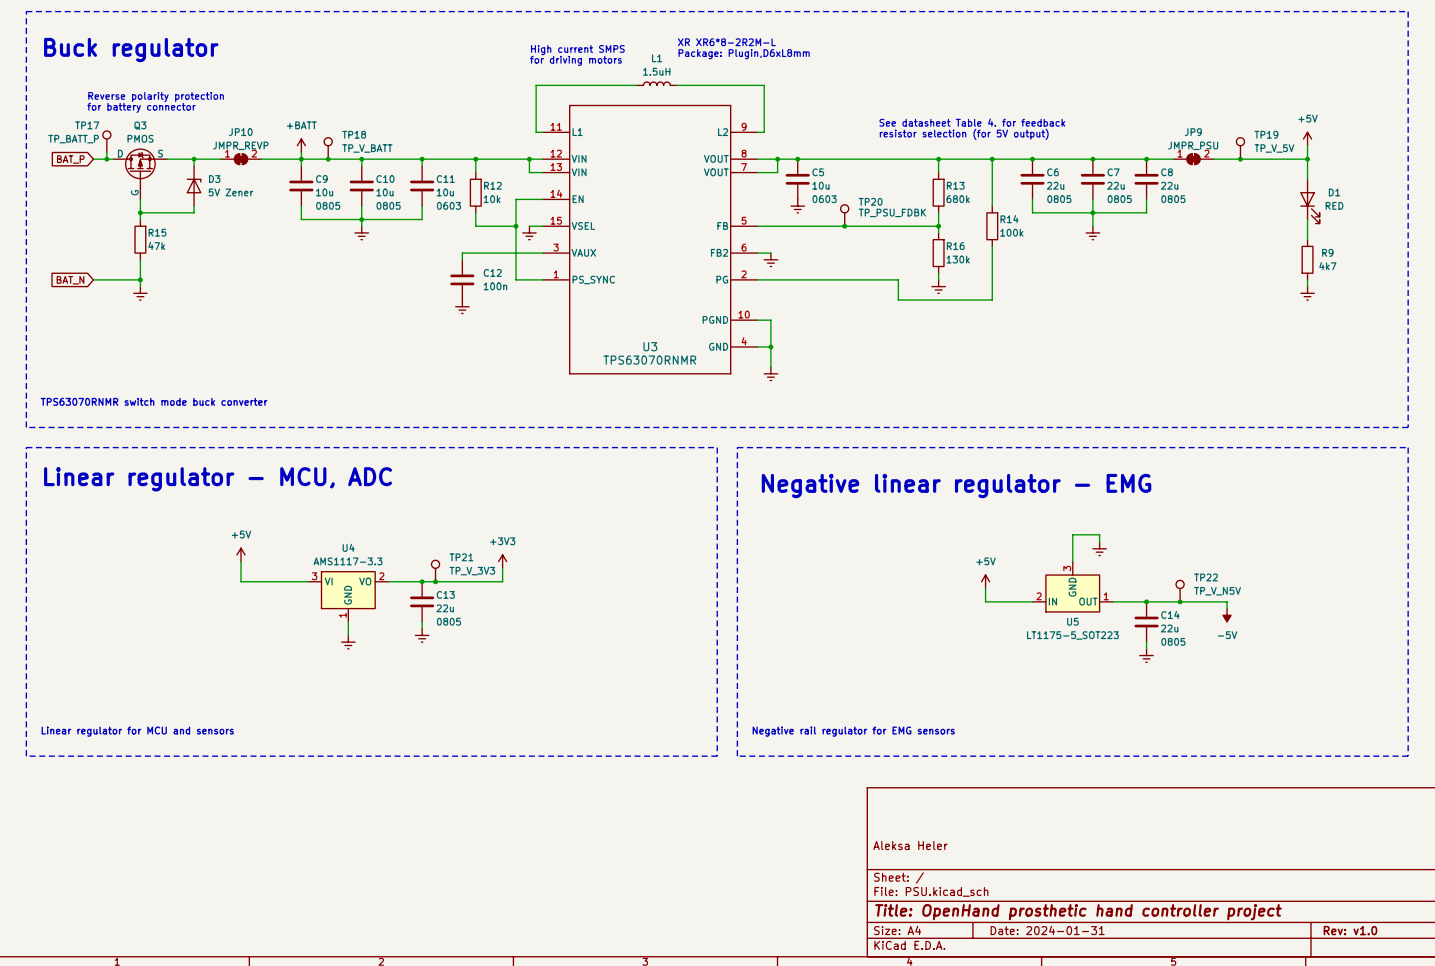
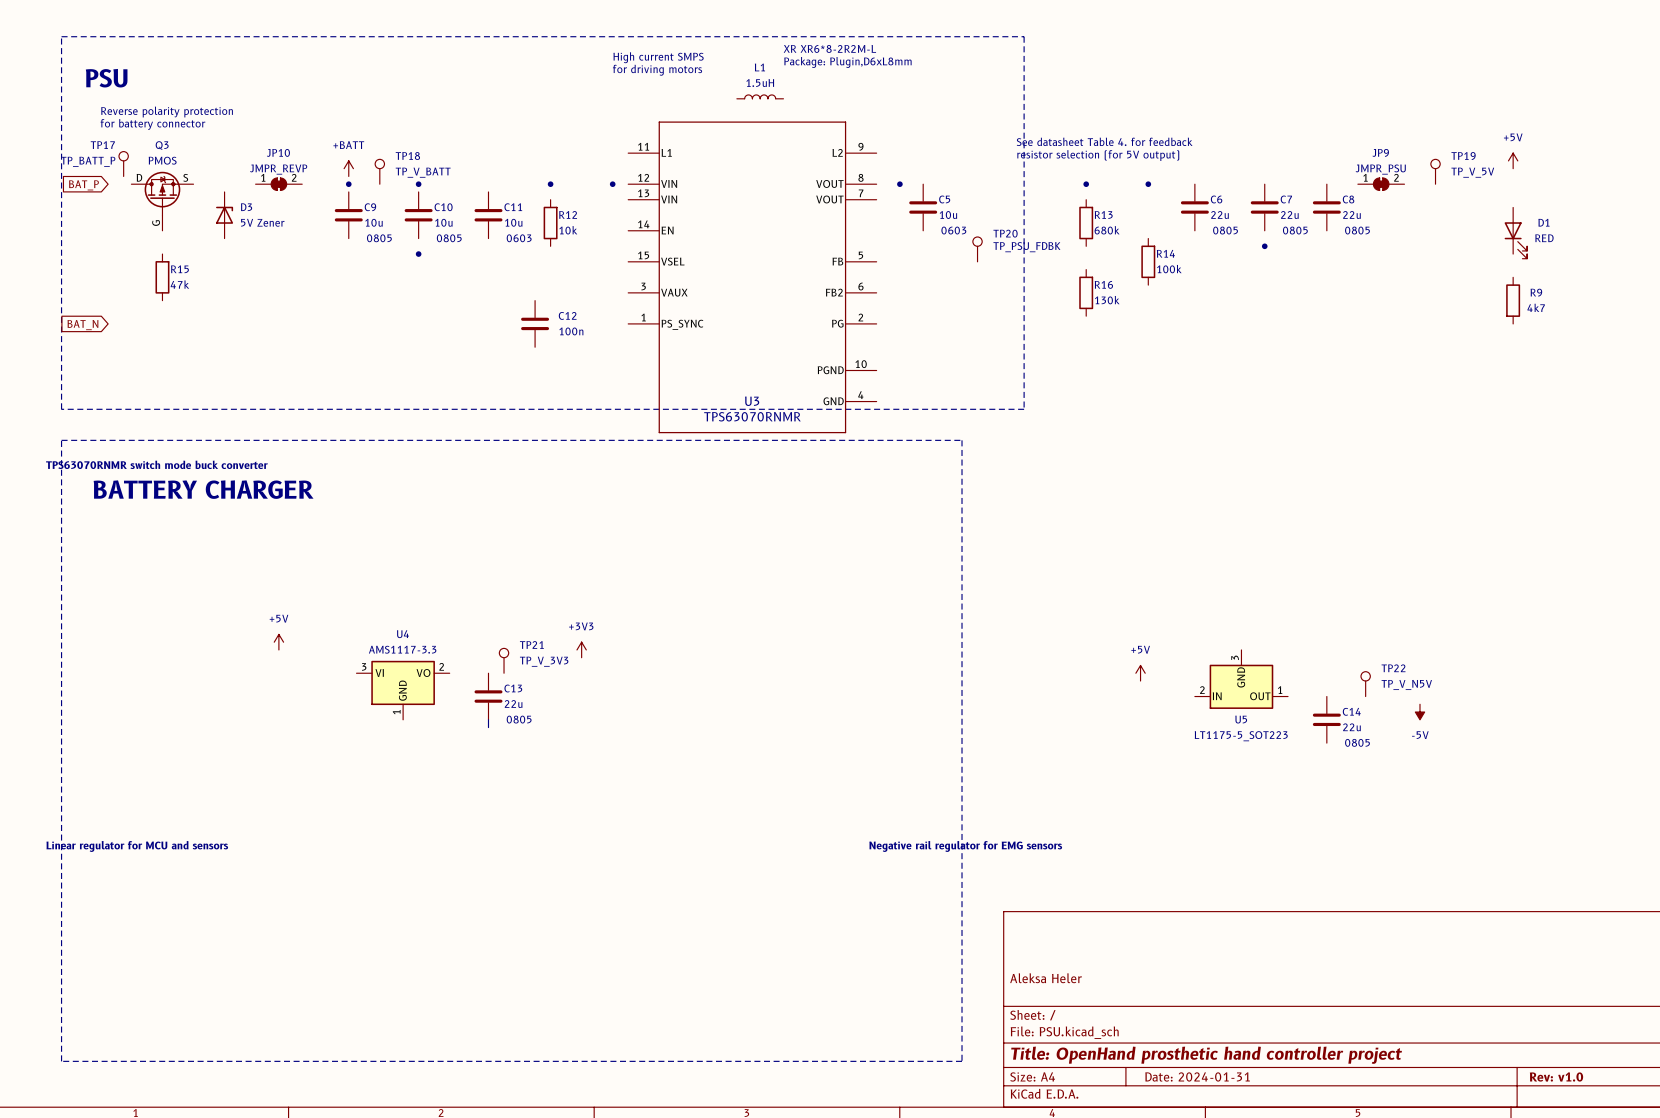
line: (26, 11) (26, 427) (1408, 427) (1408, 11) (26, 11) -> none
line: none -> (61, 36) (61, 409) (1024, 409) (1024, 36) (61, 36)
text: Buck regulator (131, 50) -> none
text: none -> PSU (106, 78)
wire: (636, 85) (536, 85) (536, 132) (542, 132) -> none
wire: (677, 85) (764, 85) (764, 132) (757, 132) -> none
wire: (1307, 145) (1307, 179) -> none
wire: (106, 152) (106, 159) -> none
wire: (301, 152) (301, 165) -> none
wire: (93, 159) (113, 159) -> none
junction: (106, 159) -> none
wire: (167, 159) (220, 159) -> none
wire: (194, 159) (194, 165) -> none
junction: (194, 159) -> none
wire: (261, 159) (542, 159) -> none
junction: (328, 159) -> none
wire: (361, 159) (361, 165) -> none
wire: (422, 159) (422, 165) -> none
junction: (422, 159) -> none
wire: (475, 159) (475, 172) -> none
wire: (529, 159) (529, 172) (542, 172) -> none
wire: (757, 159) (1173, 159) -> none
wire: (777, 159) (777, 172) (757, 172) -> none
junction: (797, 159) -> none
wire: (938, 159) (938, 172) -> none
wire: (992, 159) (992, 206) -> none
junction: (1032, 159) -> none
junction: (1092, 159) -> none
junction: (1146, 159) -> none
wire: (1213, 159) (1307, 159) -> none
junction: (1240, 159) -> none
junction: (1307, 159) -> none
wire: (140, 199) (140, 219) -> none
wire: (542, 199) (516, 199) (516, 279) (542, 279) -> none
wire: (1032, 199) (1032, 212) (1146, 212) (1146, 199) -> none
wire: (1092, 199) (1092, 226) -> none
wire: (194, 206) (194, 212) (140, 212) -> none
wire: (301, 206) (301, 219) (422, 219) (422, 206) -> none
wire: (361, 206) (361, 226) -> none
power symbol: (797, 206) -> none
junction: (140, 212) -> none
wire: (475, 212) (475, 226) (516, 226) -> none
wire: (938, 212) (938, 232) -> none
wire: (1307, 219) (1307, 239) -> none
junction: (516, 226) -> none
wire: (529, 226) (542, 226) -> none
wire: (757, 226) (938, 226) -> none
junction: (844, 226) -> none
junction: (938, 226) -> none
power symbol: (361, 232) -> none
power symbol: (529, 232) -> none
power symbol: (1092, 232) -> none
wire: (992, 246) (992, 300) (898, 300) (898, 279) (757, 279) -> none
wire: (542, 253) (462, 253) (462, 259) -> none
wire: (757, 253) (770, 253) -> none
wire: (140, 259) (140, 286) -> none
power symbol: (770, 259) -> none
wire: (938, 273) (938, 279) -> none
wire: (93, 279) (140, 279) -> none
junction: (140, 279) -> none
wire: (1307, 279) (1307, 286) -> none
power symbol: (938, 286) -> none
power symbol: (140, 293) -> none
power symbol: (1307, 293) -> none
power symbol: (462, 306) -> none
wire: (757, 320) (770, 320) (770, 367) -> none
wire: (757, 346) (770, 346) -> none
junction: (770, 346) -> none
power symbol: (770, 373) -> none
line: none -> (61, 440) (962, 440) (962, 1061) (61, 1061) (61, 440)
text: none -> BATTERY CHARGER (203, 489)
line: (26, 447) (717, 447) (717, 756) (26, 756) (26, 447) -> none
line: (737, 447) (1408, 447) (1408, 756) (737, 756) (737, 447) -> none
text: Linear regulator - MCU, ADC (218, 479) -> none
text: Negative linear regulator - EMG (956, 486) -> none
wire: (1099, 542) (1099, 534) (1072, 534) (1072, 561) -> none
power symbol: (1099, 548) -> none
wire: (241, 561) (241, 581) (308, 581) -> none
wire: (502, 568) (502, 581) (388, 581) -> none
junction: (422, 581) -> none
junction: (435, 581) -> none
wire: (985, 588) (985, 601) (1032, 601) -> none
wire: (1113, 601) (1227, 601) (1227, 608) -> none
junction: (1146, 601) -> none
junction: (1180, 601) -> none
wire: (348, 622) (348, 635) -> none
power symbol: (422, 635) -> none
power symbol: (348, 642) -> none
wire: (1146, 642) (1146, 648) -> none
power symbol: (1146, 655) -> none

